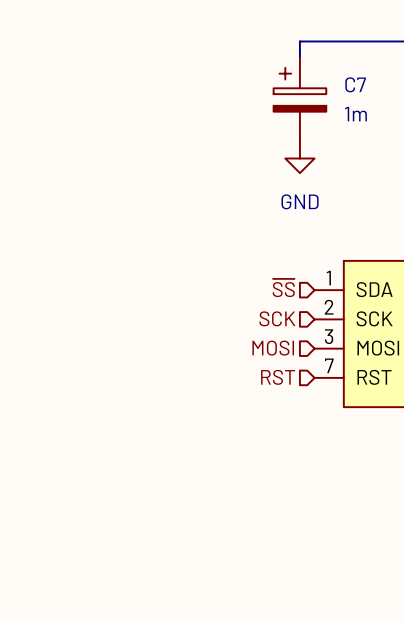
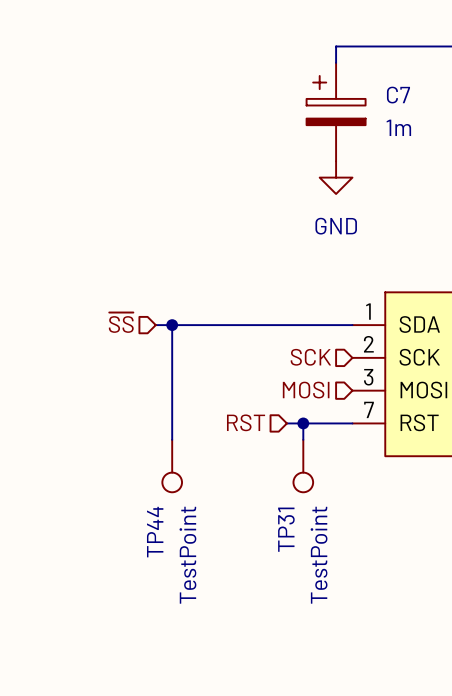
hierarchical label position: ~{SS} (283, 287) -> ~{SS} (121, 322)
wire: none -> (155, 325) (352, 325)
wire: none -> (172, 325) (172, 439)
junction: none -> (172, 325)
wire: none -> (286, 423) (352, 423)
wire: none -> (303, 423) (303, 439)
junction: none -> (303, 423)
hierarchical label position: RST (278, 377) -> RST (246, 422)
TP44: none -> TestPoint (172, 466)
TP31: none -> TestPoint (303, 466)

